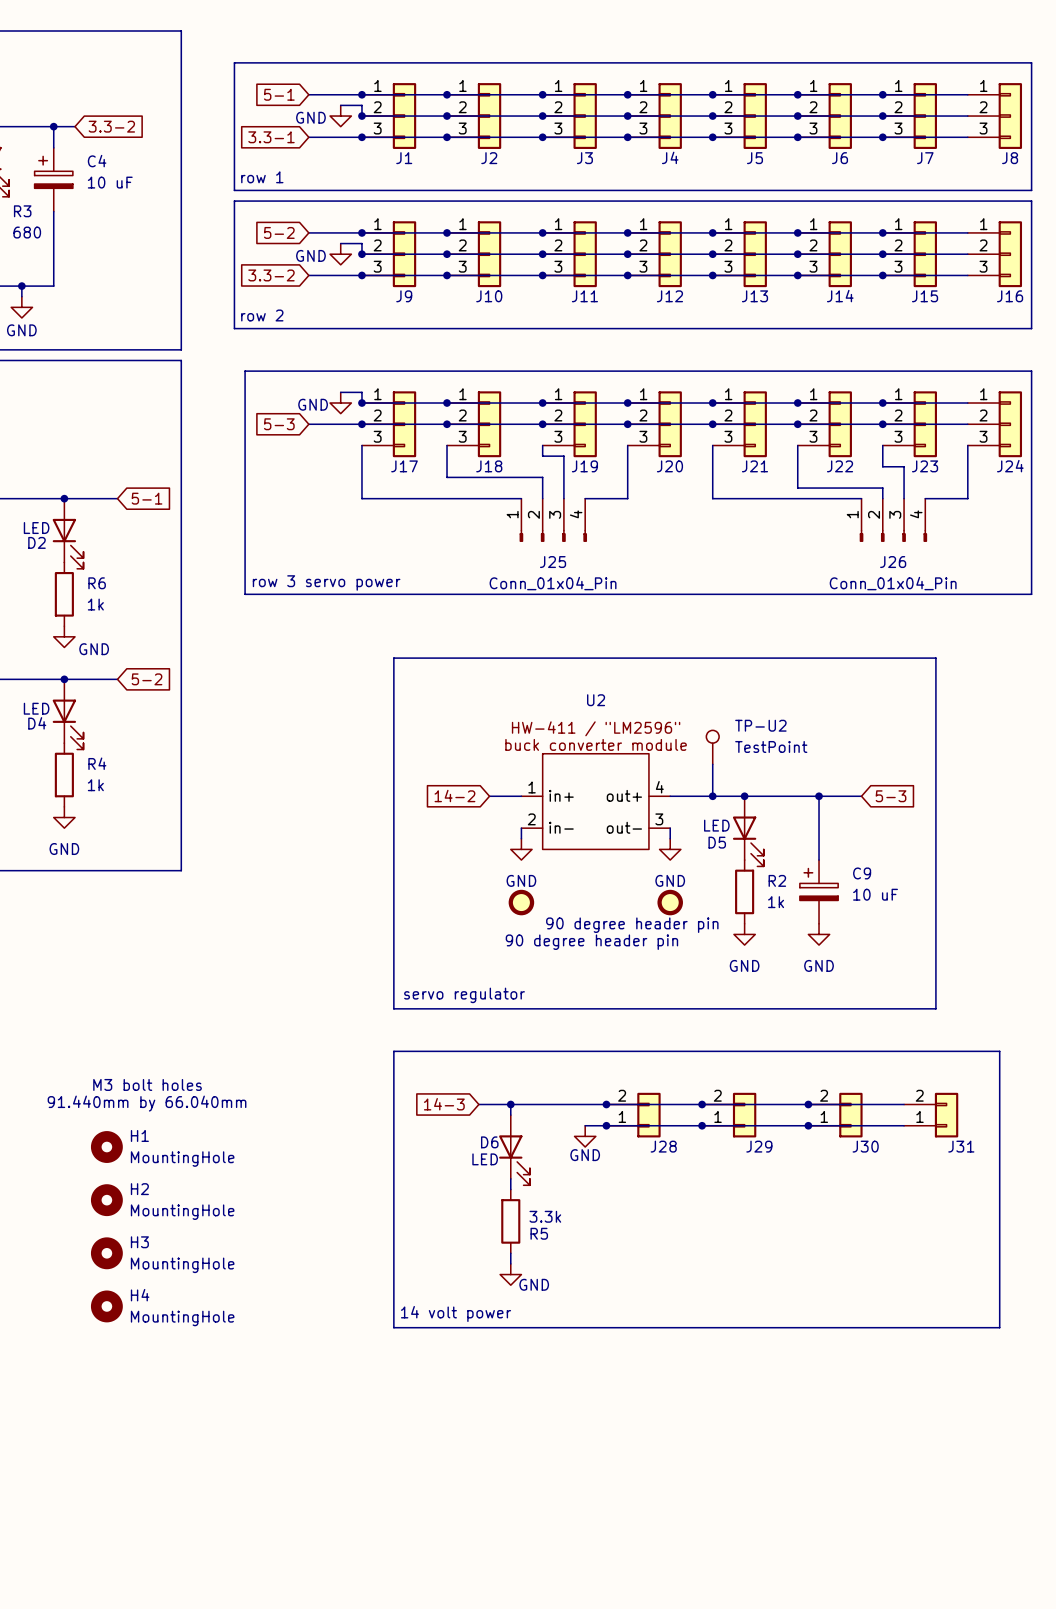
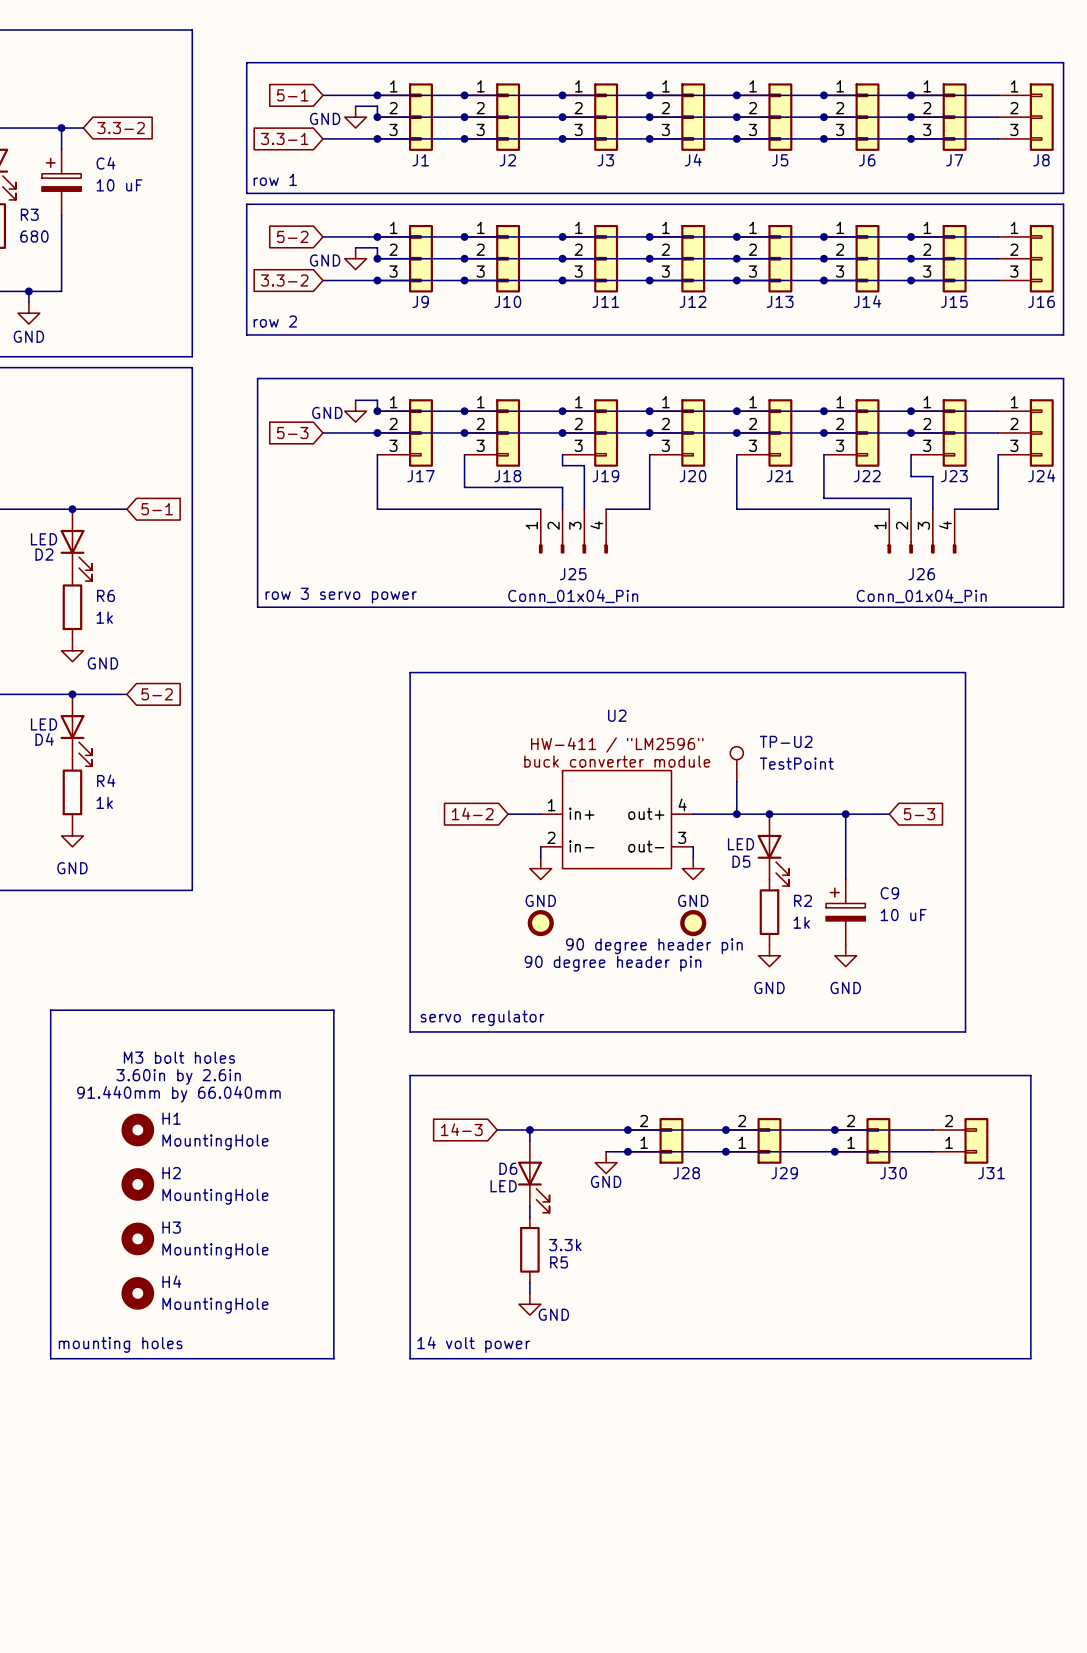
line: none -> (50, 1010) (333, 1010) (333, 1358) (50, 1358) (50, 1010)
text: none -> 3.60in by 2.6in (178, 1076)
text position: M3 bolt holes (147, 1084) -> M3 bolt holes (179, 1057)
text position: 91.440mm by 66.040mm (147, 1103) -> 91.440mm by 66.040mm (178, 1094)
H1 position: (106, 1147) -> (137, 1130)
H2 position: (106, 1200) -> (137, 1184)
H3 position: (106, 1253) -> (137, 1238)
H4 position: (106, 1306) -> (137, 1293)
text: none -> mounting holes (120, 1344)

